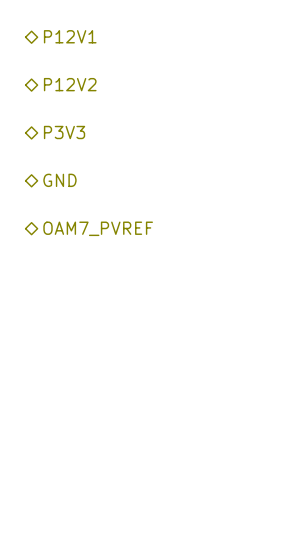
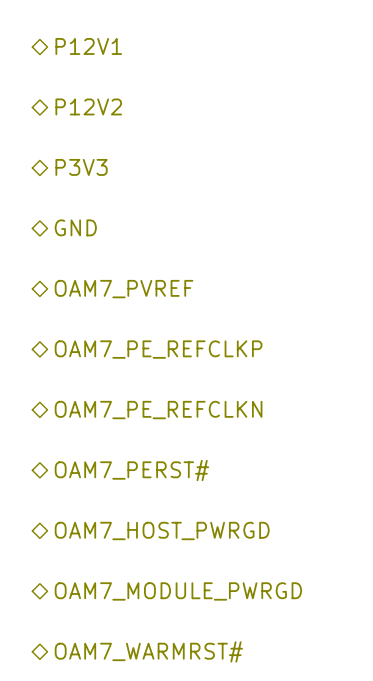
hierarchical label: none -> OAM7_PE_REFCLKP (158, 349)
hierarchical label: none -> OAM7_PE_REFCLKN (158, 410)
hierarchical label: none -> OAM7_PERST# (131, 470)
hierarchical label: none -> OAM7_HOST_PWRGD (162, 530)
hierarchical label: none -> OAM7_MODULE_PWRGD (178, 591)
hierarchical label: none -> OAM7_WARMRST# (148, 651)

